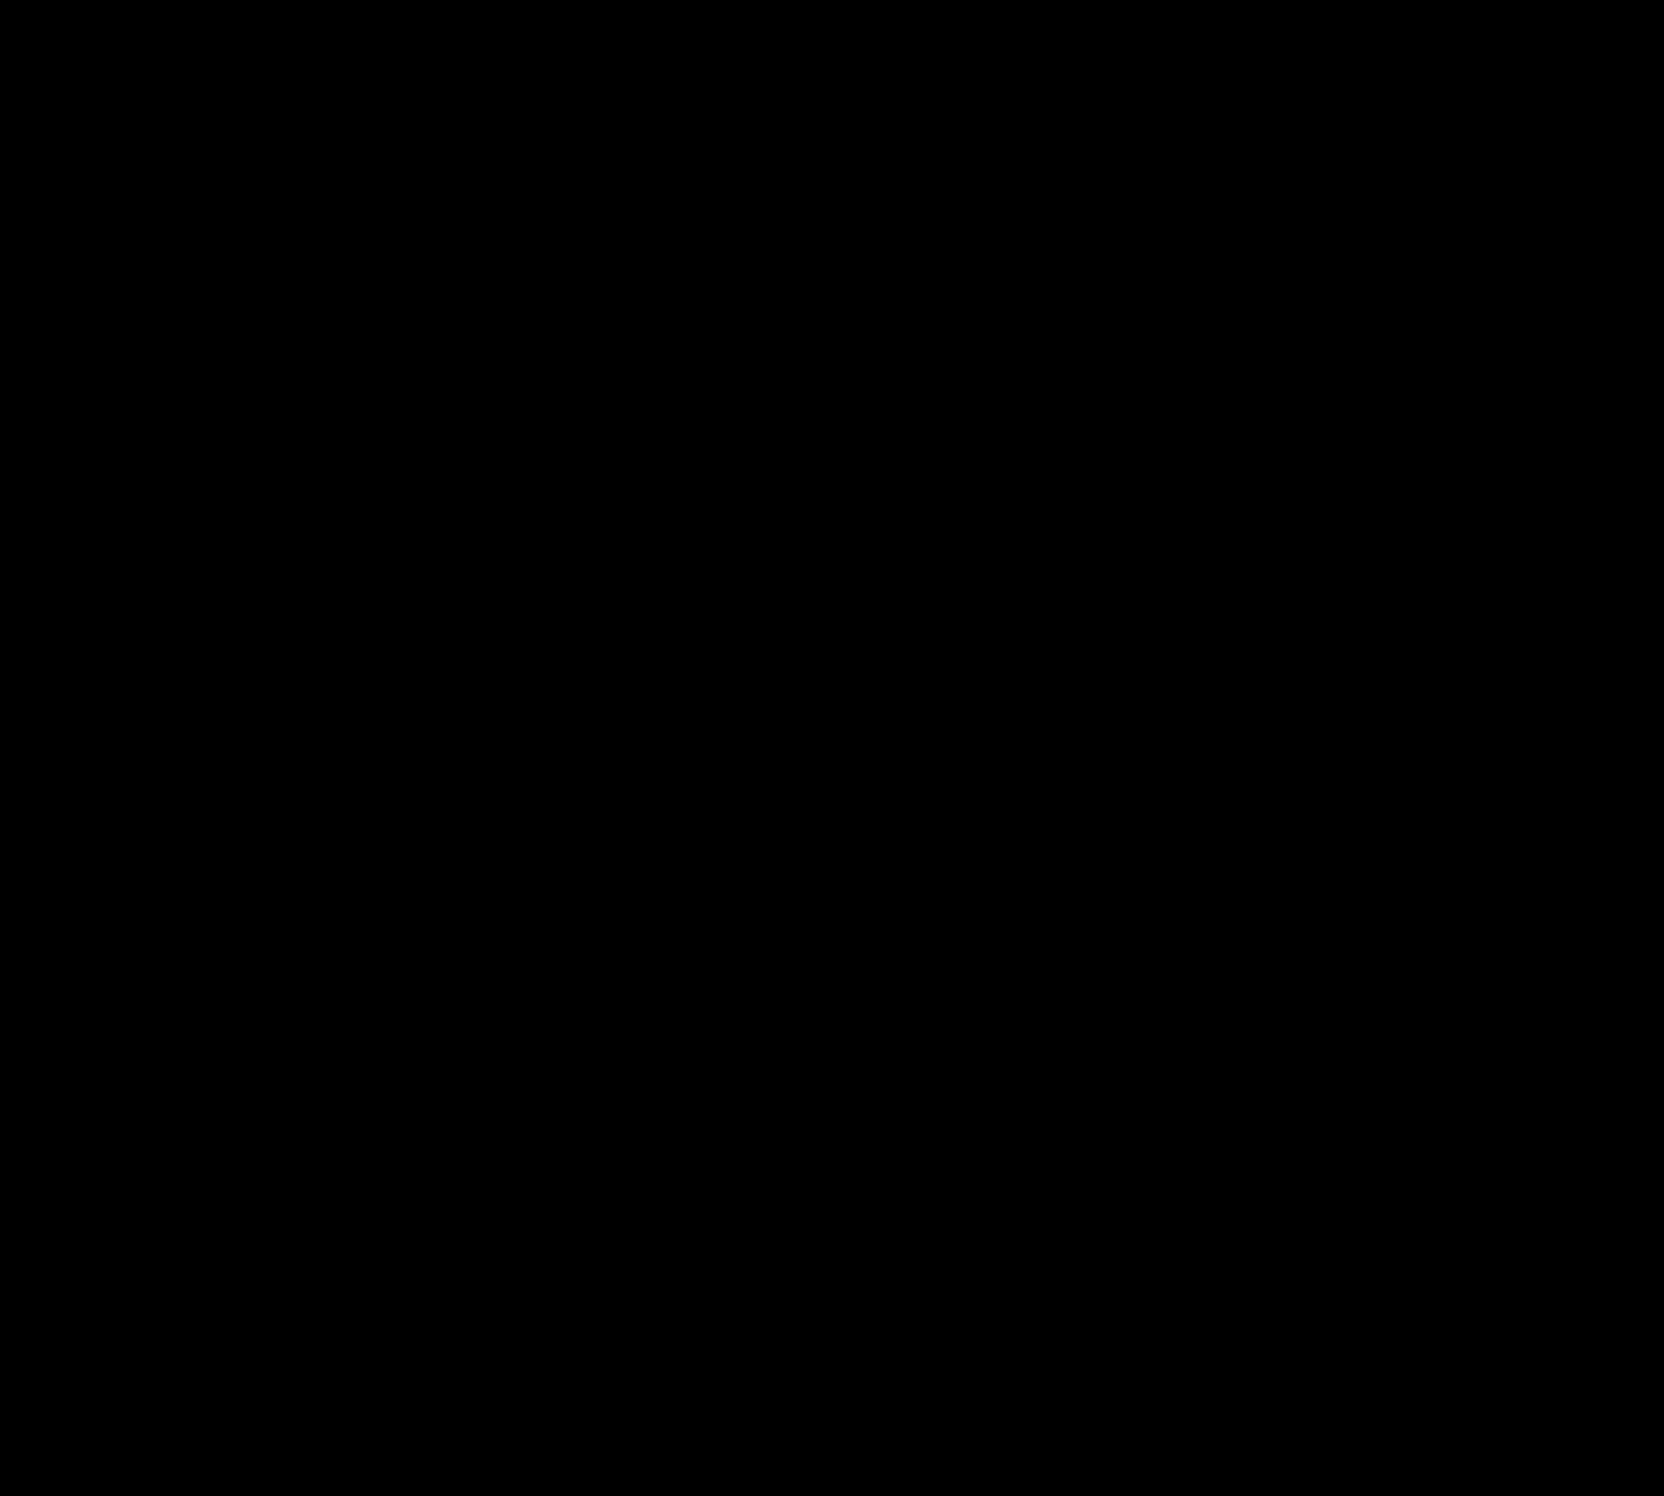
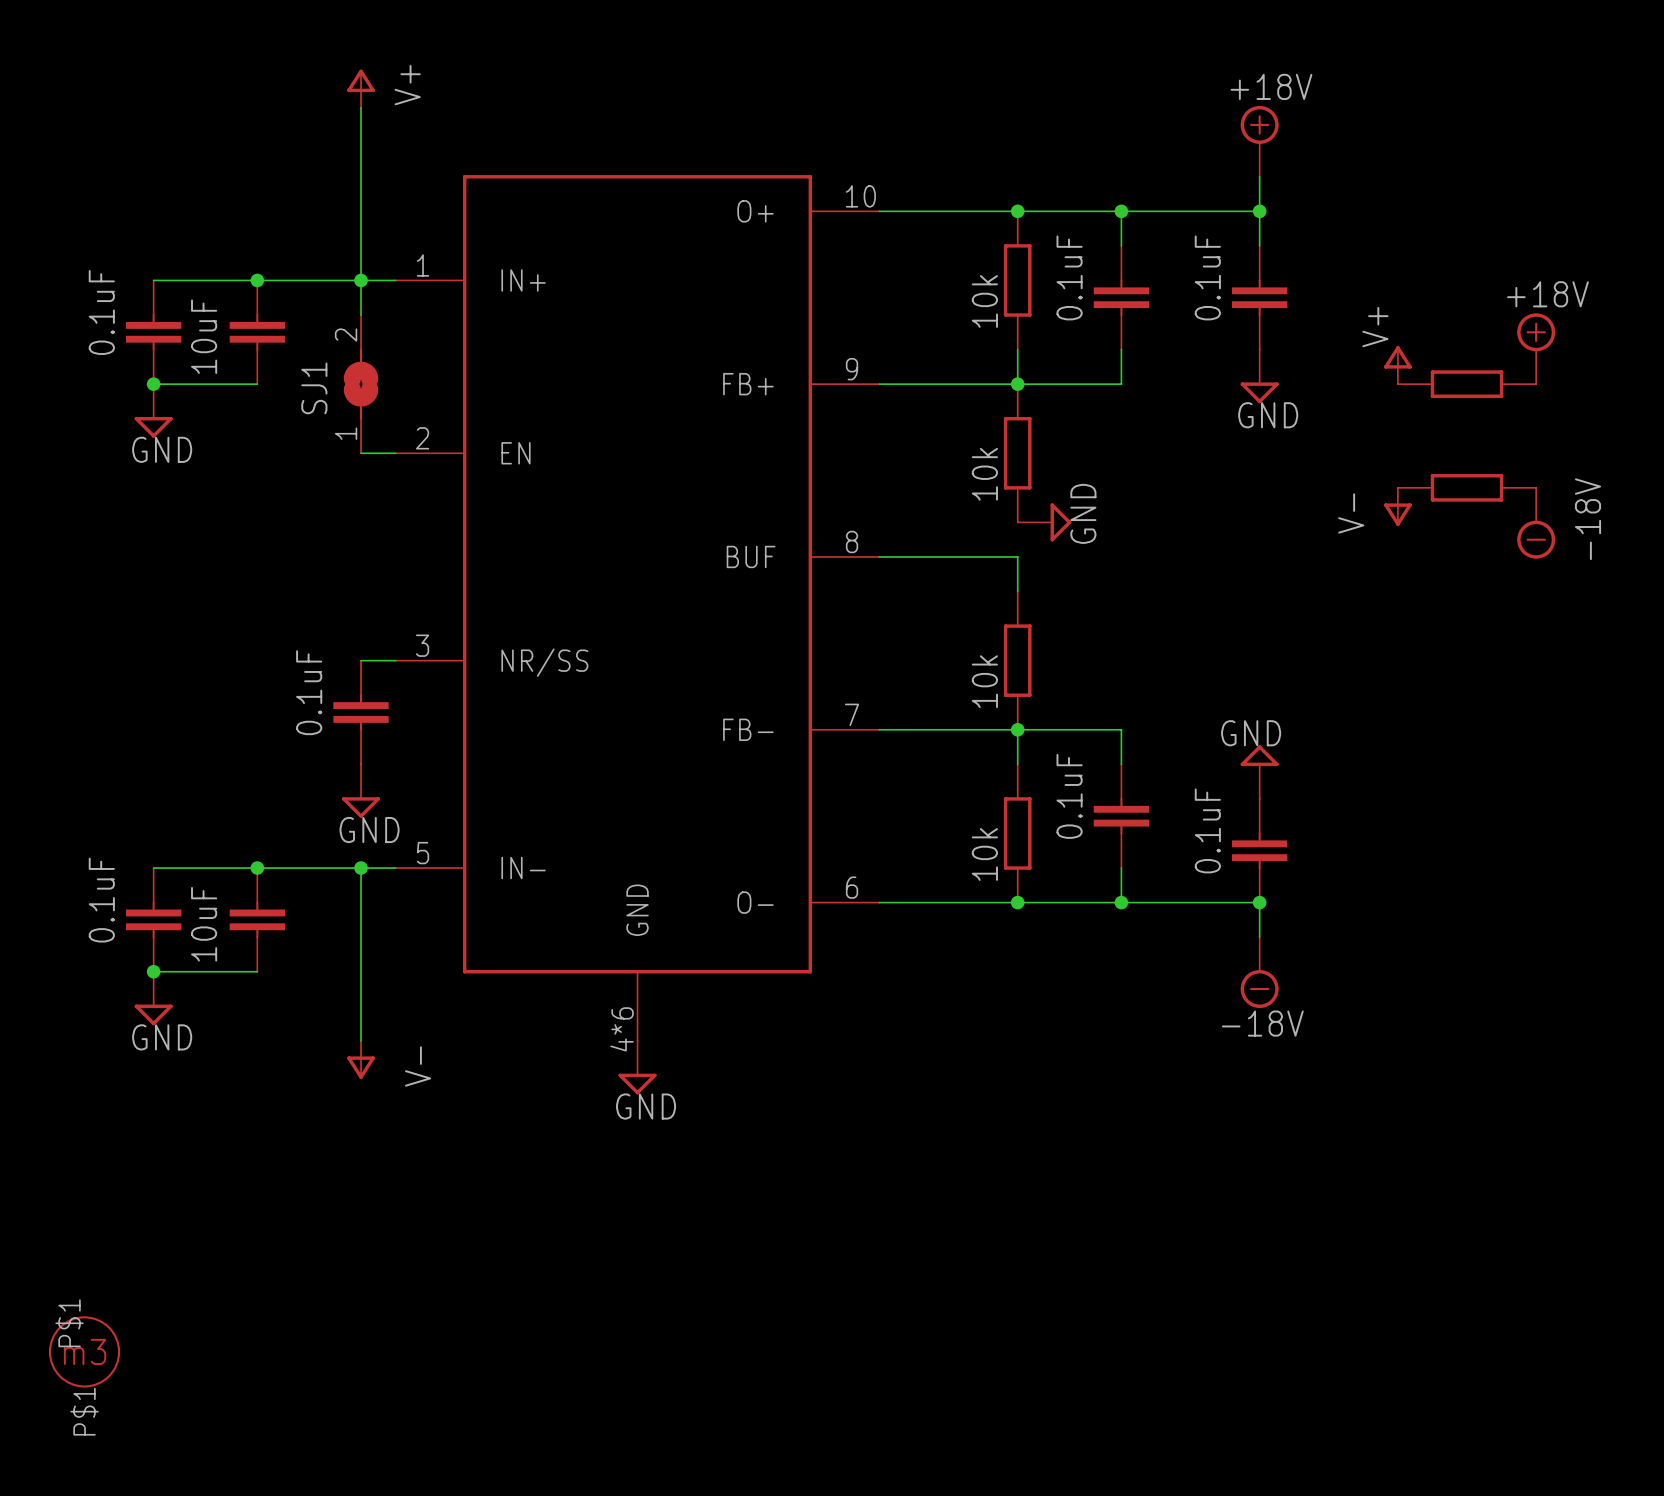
power symbol: none -> V+ (361, 88)
wire: none -> (361, 107) (361, 315)
power symbol: none -> +18V (1259, 141)
wire: none -> (1259, 176) (1259, 245)
wire: none -> (879, 211) (1259, 211)
junction: none -> (1017, 211)
wire: none -> (1121, 211) (1121, 245)
junction: none -> (1121, 211)
junction: none -> (1259, 211)
wire: none -> (153, 280) (395, 280)
junction: none -> (257, 280)
junction: none -> (361, 280)
part: none -> 10k (1017, 280)
part: none -> 0.1uF (1121, 297)
part: none -> 0.1uF (1259, 297)
part: none -> 0.1uF (153, 332)
part: none -> 10uF (257, 332)
power symbol: none -> +18V (1536, 348)
wire: none -> (1017, 349) (1017, 384)
wire: none -> (1121, 349) (1121, 384) (879, 384)
power symbol: none -> V+ (1397, 365)
power symbol: none -> GND (1259, 376)
wire: none -> (153, 384) (257, 384)
junction: none -> (153, 384)
SJ1: none -> (361, 384)
junction: none -> (1017, 384)
part: none -> (1467, 384)
power symbol: none -> GND (153, 410)
wire: none -> (361, 453) (395, 453)
part: none -> 10k (1017, 453)
part: none -> (1467, 487)
power symbol: none -> V- (1397, 506)
power symbol: none -> GND (1044, 522)
power symbol: none -> -18V (1536, 523)
wire: none -> (879, 556) (1017, 556) (1017, 591)
part: none -> (637, 607)
wire: none -> (361, 660) (395, 660)
part: none -> 10k (1017, 660)
part: none -> 0.1uF (361, 712)
wire: none -> (879, 729) (1121, 729) (1121, 764)
wire: none -> (1017, 729) (1017, 764)
junction: none -> (1017, 729)
power symbol: none -> GND (1259, 772)
power symbol: none -> GND (361, 791)
part: none -> 0.1uF (1121, 816)
part: none -> 10k (1017, 833)
part: none -> 0.1uF (1259, 850)
wire: none -> (153, 868) (395, 868)
junction: none -> (257, 868)
wire: none -> (361, 868) (361, 1040)
junction: none -> (361, 868)
wire: none -> (1121, 868) (1121, 902)
wire: none -> (879, 902) (1259, 902) (1259, 937)
junction: none -> (1017, 902)
junction: none -> (1121, 902)
junction: none -> (1259, 902)
part: none -> 0.1uF (153, 919)
part: none -> 10uF (257, 919)
wire: none -> (153, 971) (257, 971)
junction: none -> (153, 971)
power symbol: none -> -18V (1259, 972)
power symbol: none -> GND (153, 998)
power symbol: none -> V- (361, 1059)
power symbol: none -> GND (637, 1067)
part: none -> (84, 1351)

